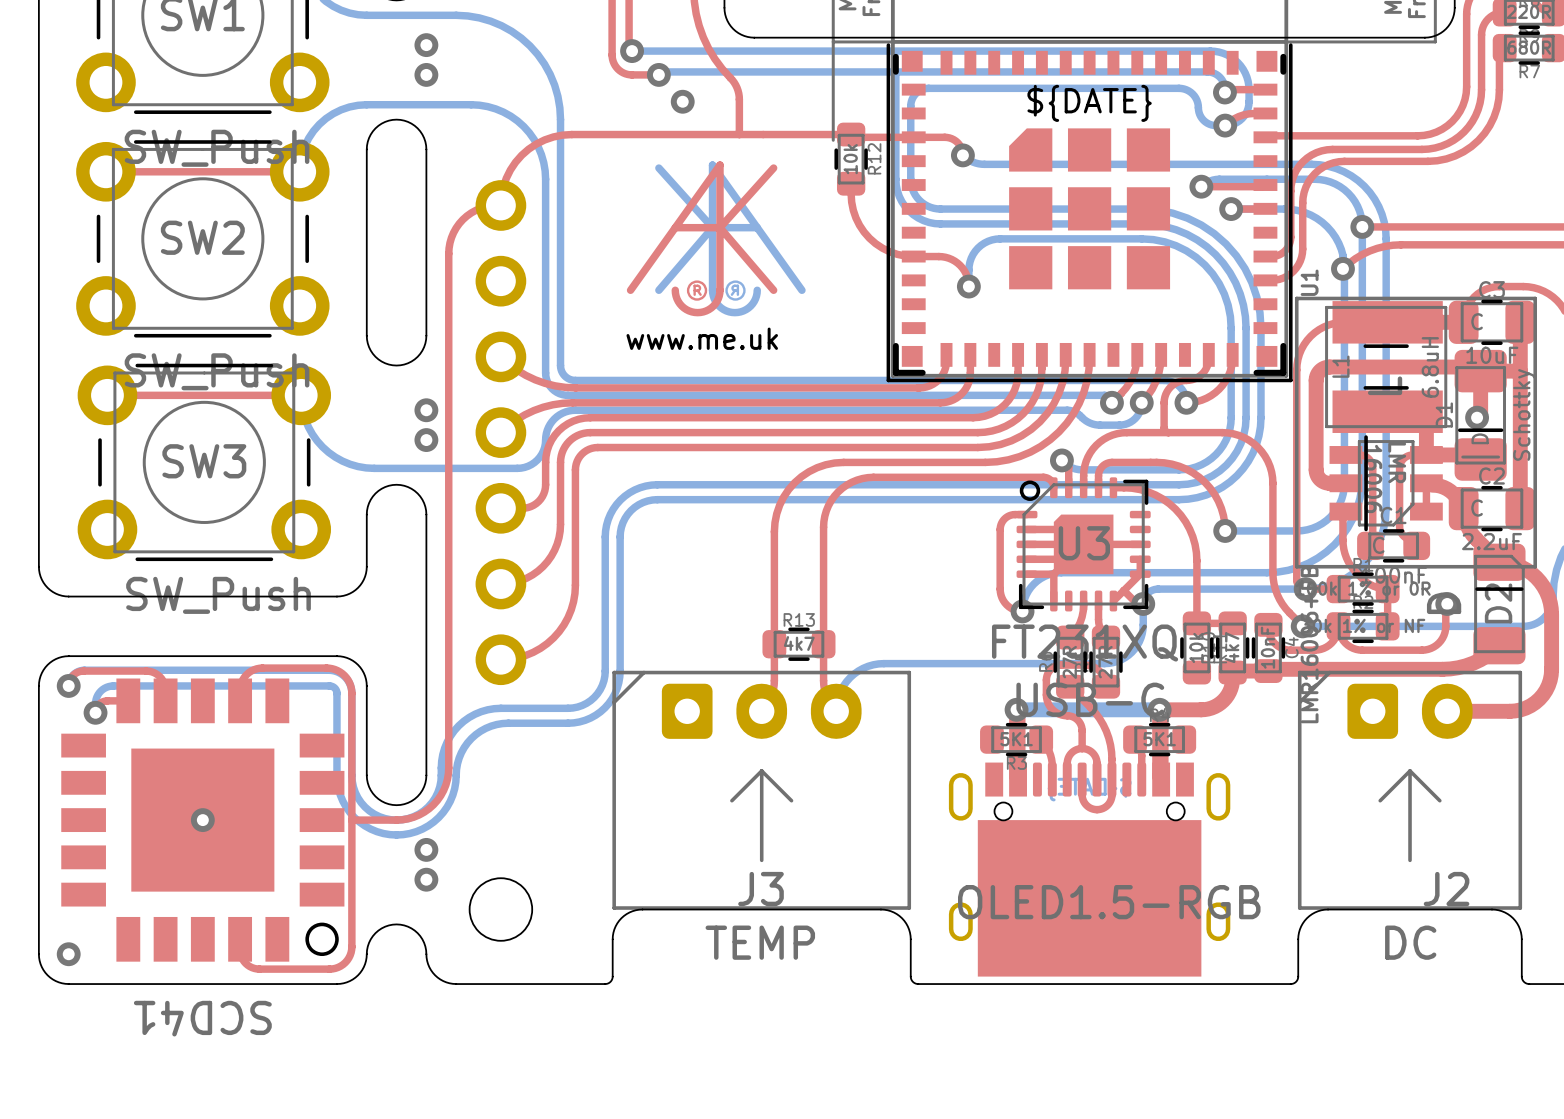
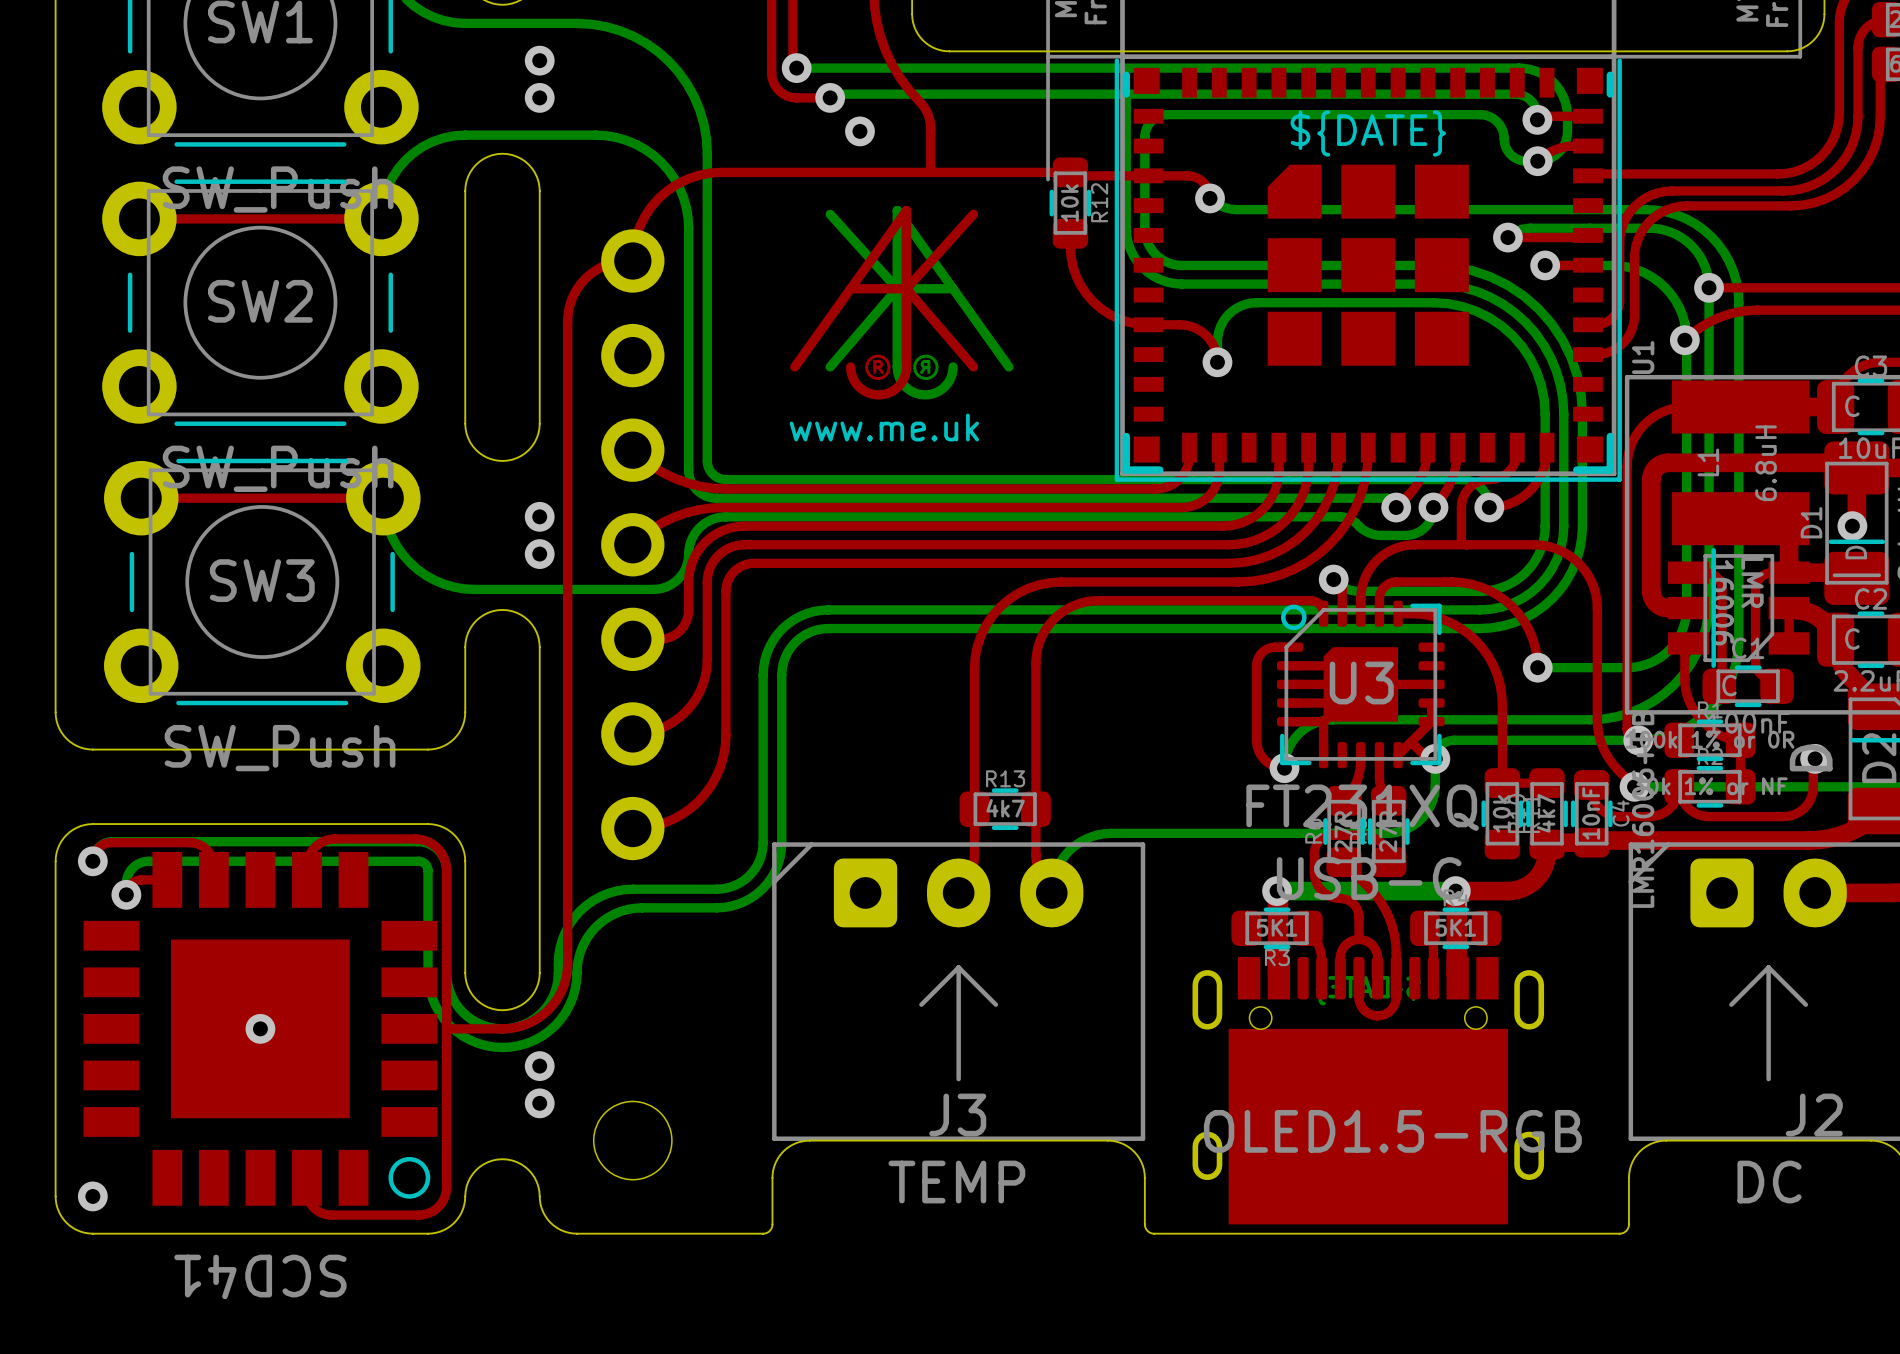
L1 footprint: [1325, 305, 1448, 429] -> [1697, 425, 1777, 502]

